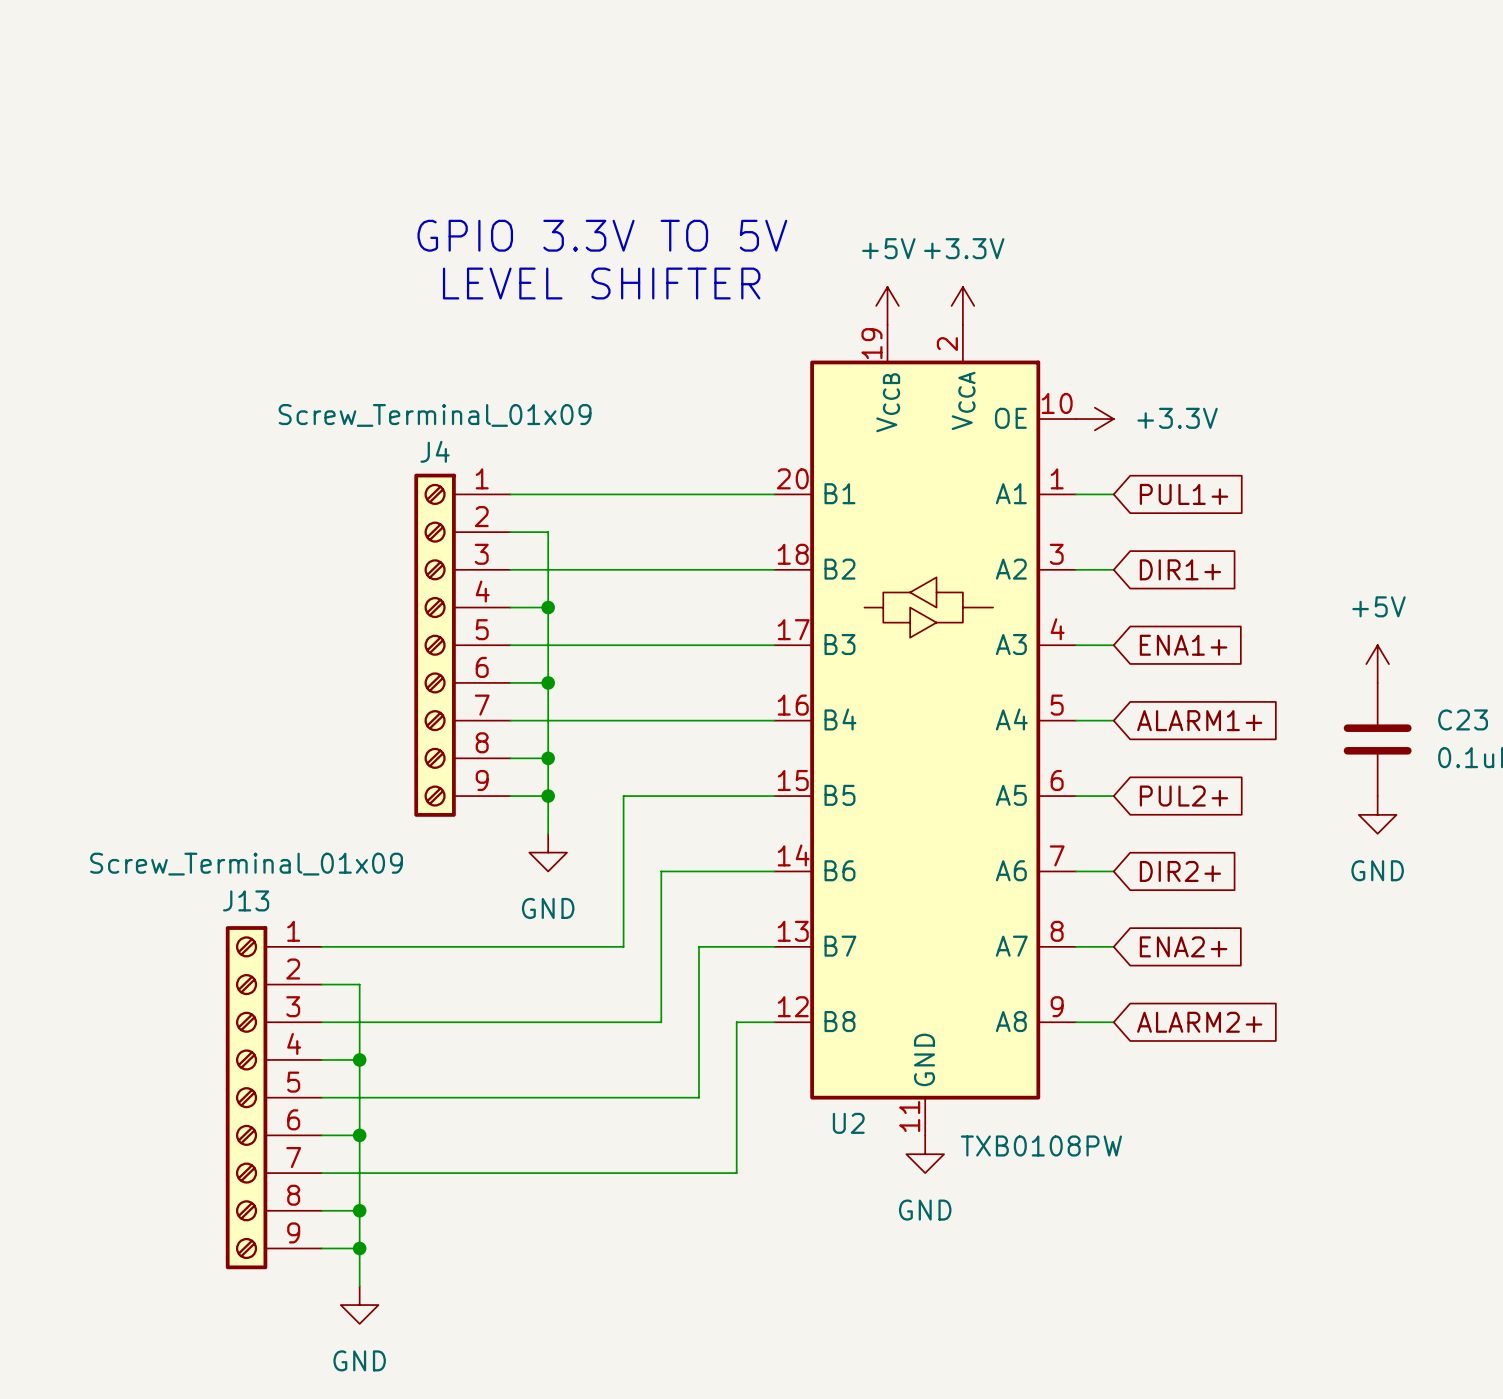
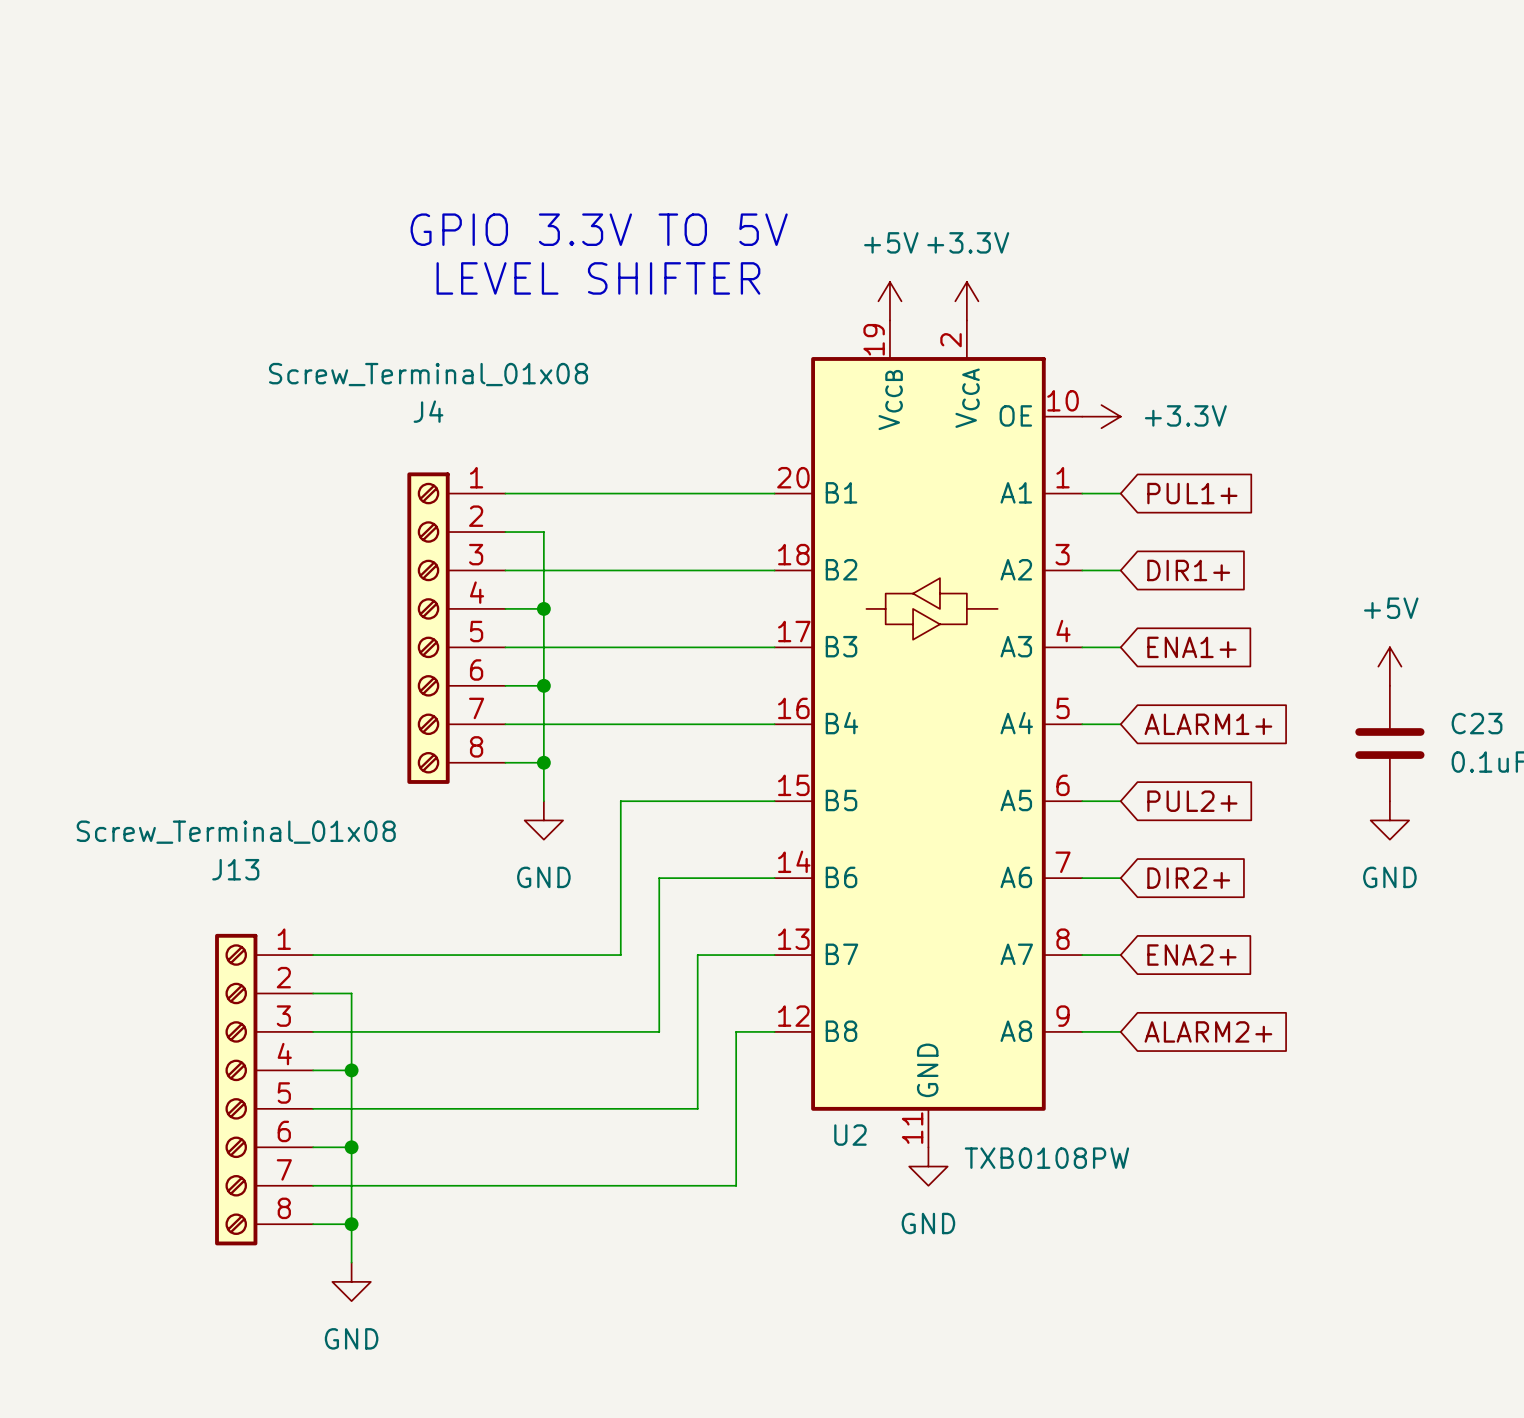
J4 value: Screw_Terminal_01x09 (435, 415) -> Screw_Terminal_01x08 (428, 374)
J4 symbol: [414, 473, 511, 817] -> [407, 472, 506, 784]
wire: (510, 796) (548, 796) (548, 833) -> none
junction: (548, 796) -> none
power symbol position: GND (548, 852) -> GND (543, 820)
J13 value: Screw_Terminal_01x09 (246, 864) -> Screw_Terminal_01x08 (236, 832)
J13 symbol: [225, 926, 322, 1270] -> [215, 933, 314, 1246]
wire: (321, 1248) (359, 1248) (359, 1286) -> none
junction: (359, 1248) -> none
power symbol position: GND (359, 1305) -> GND (351, 1281)

